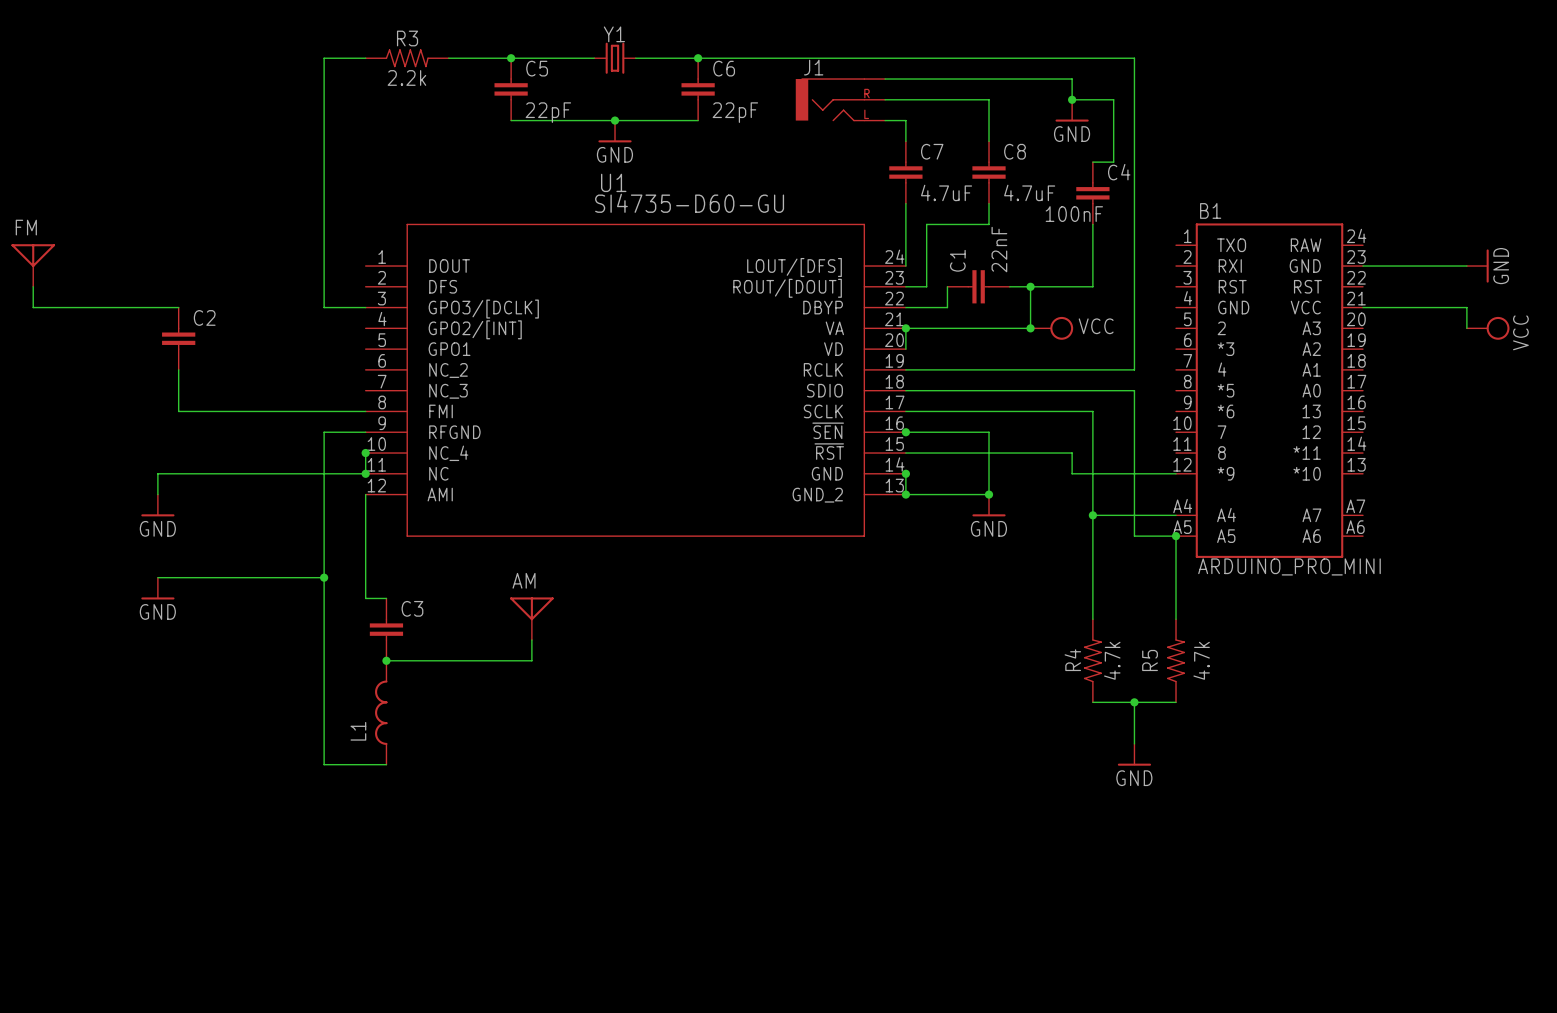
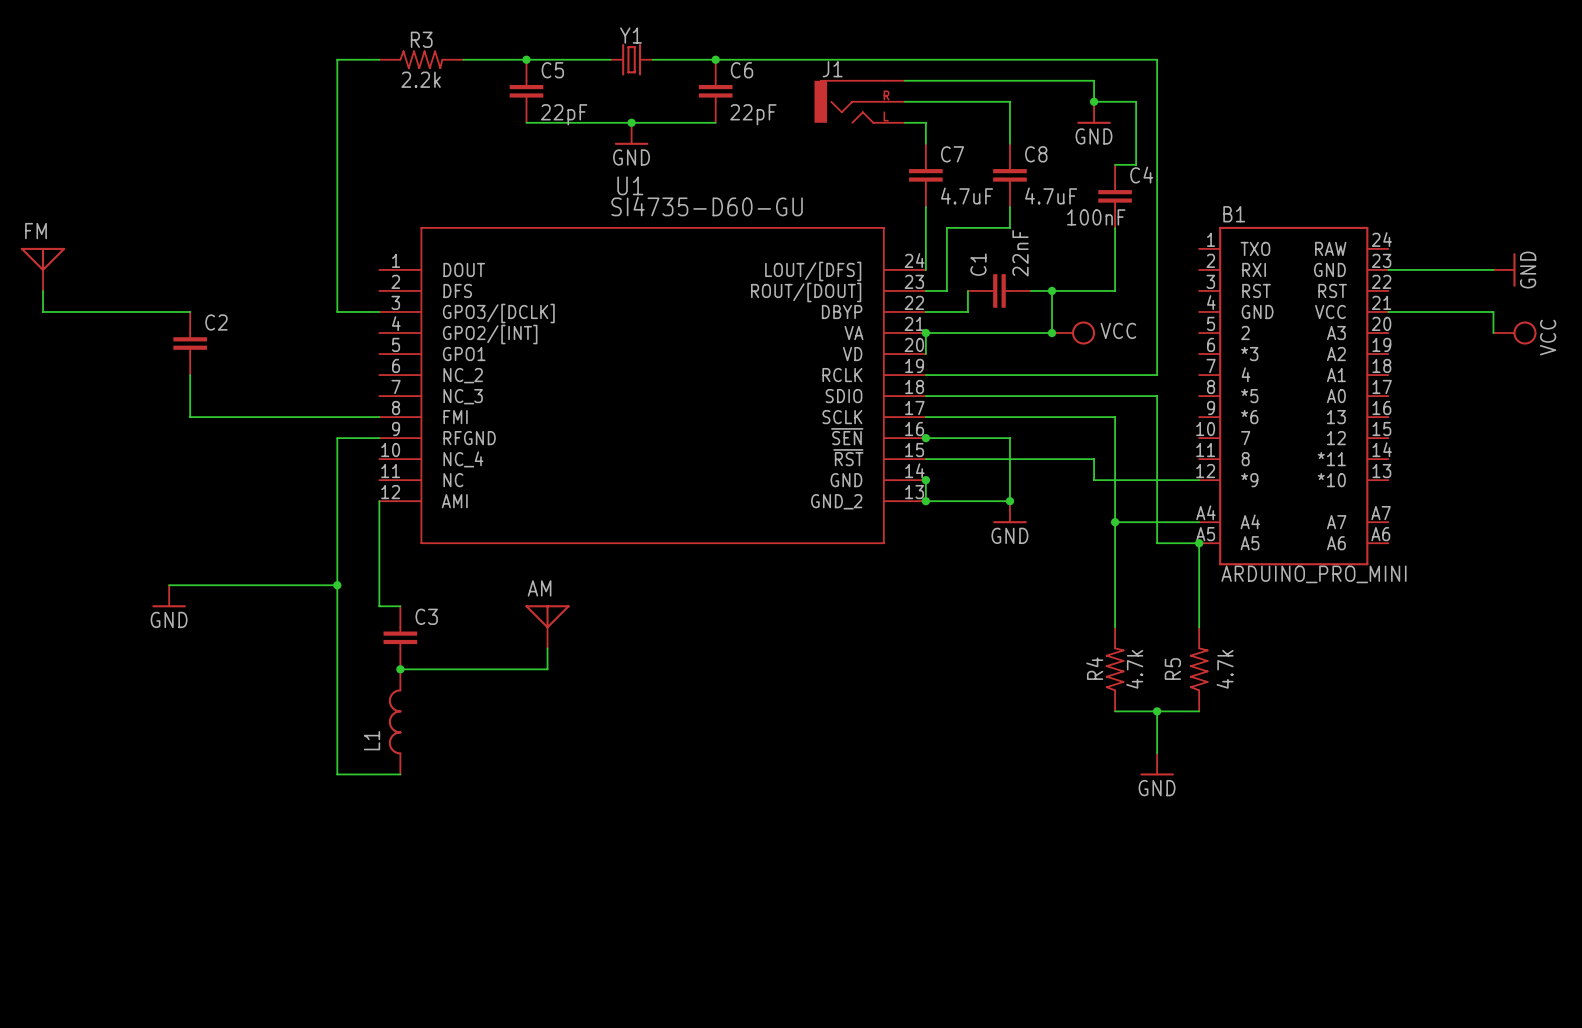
wire: (365, 453) (365, 473) (157, 473) (157, 494) -> none
junction: (365, 453) -> none
junction: (365, 473) -> none
power symbol: GND (157, 505) -> none

